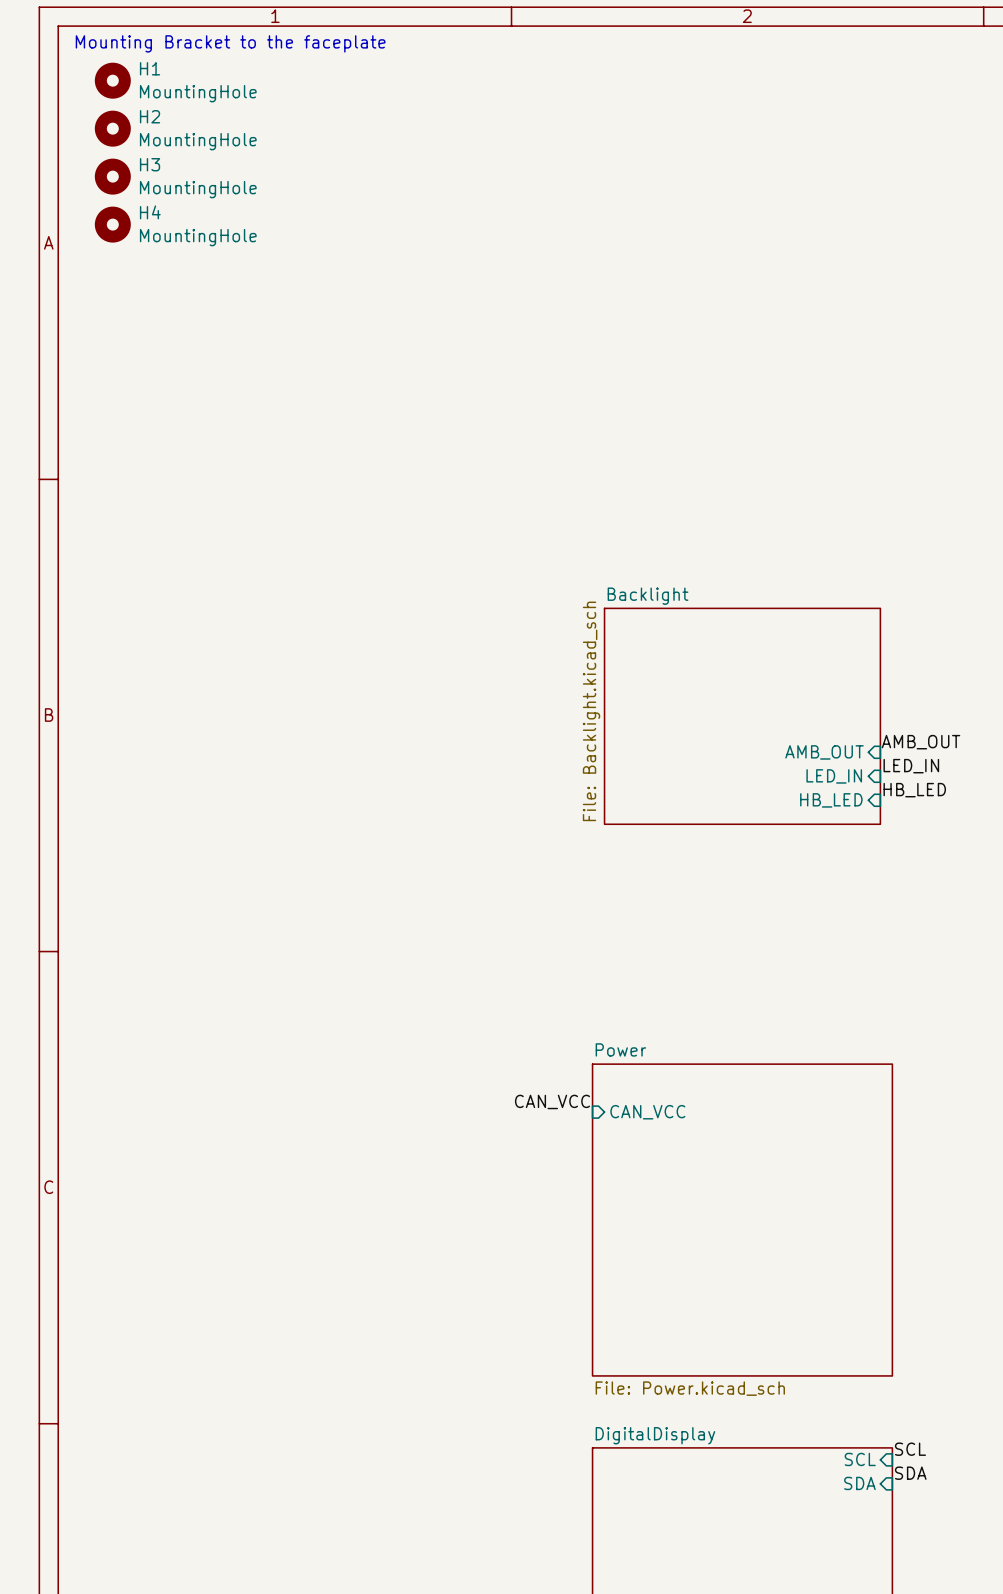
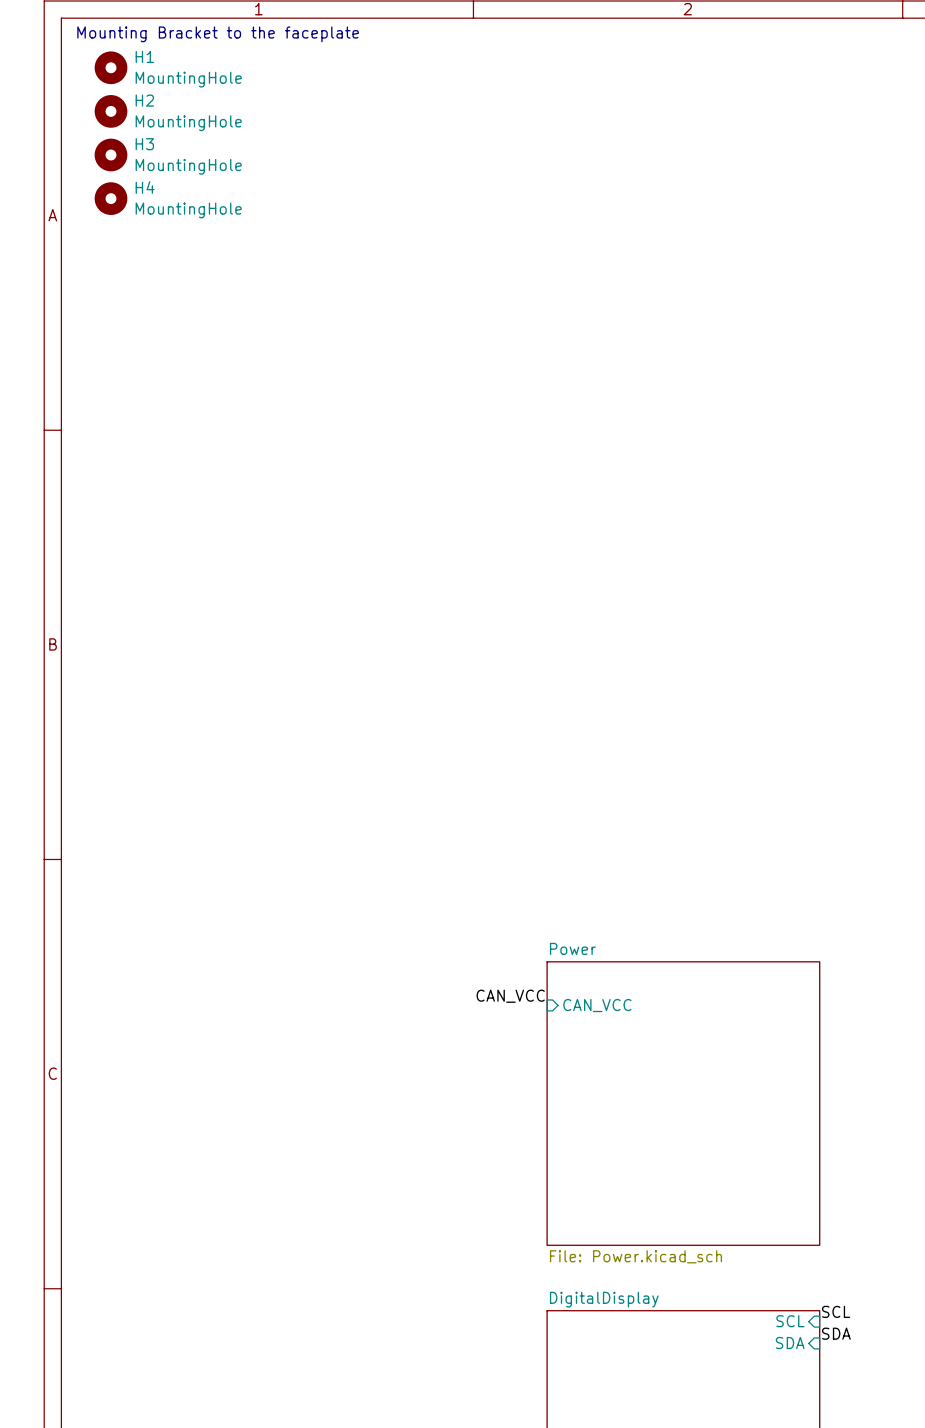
sheet Backlight: File: Backlight.kicad_sch (742, 716) -> none
label: AMB_OUT (921, 742) -> none
sheet pin: AMB_OUT (824, 752) -> none
label: LED_IN (911, 766) -> none
sheet pin: LED_IN (834, 776) -> none
label: HB_LED (914, 790) -> none
sheet pin: HB_LED (831, 800) -> none

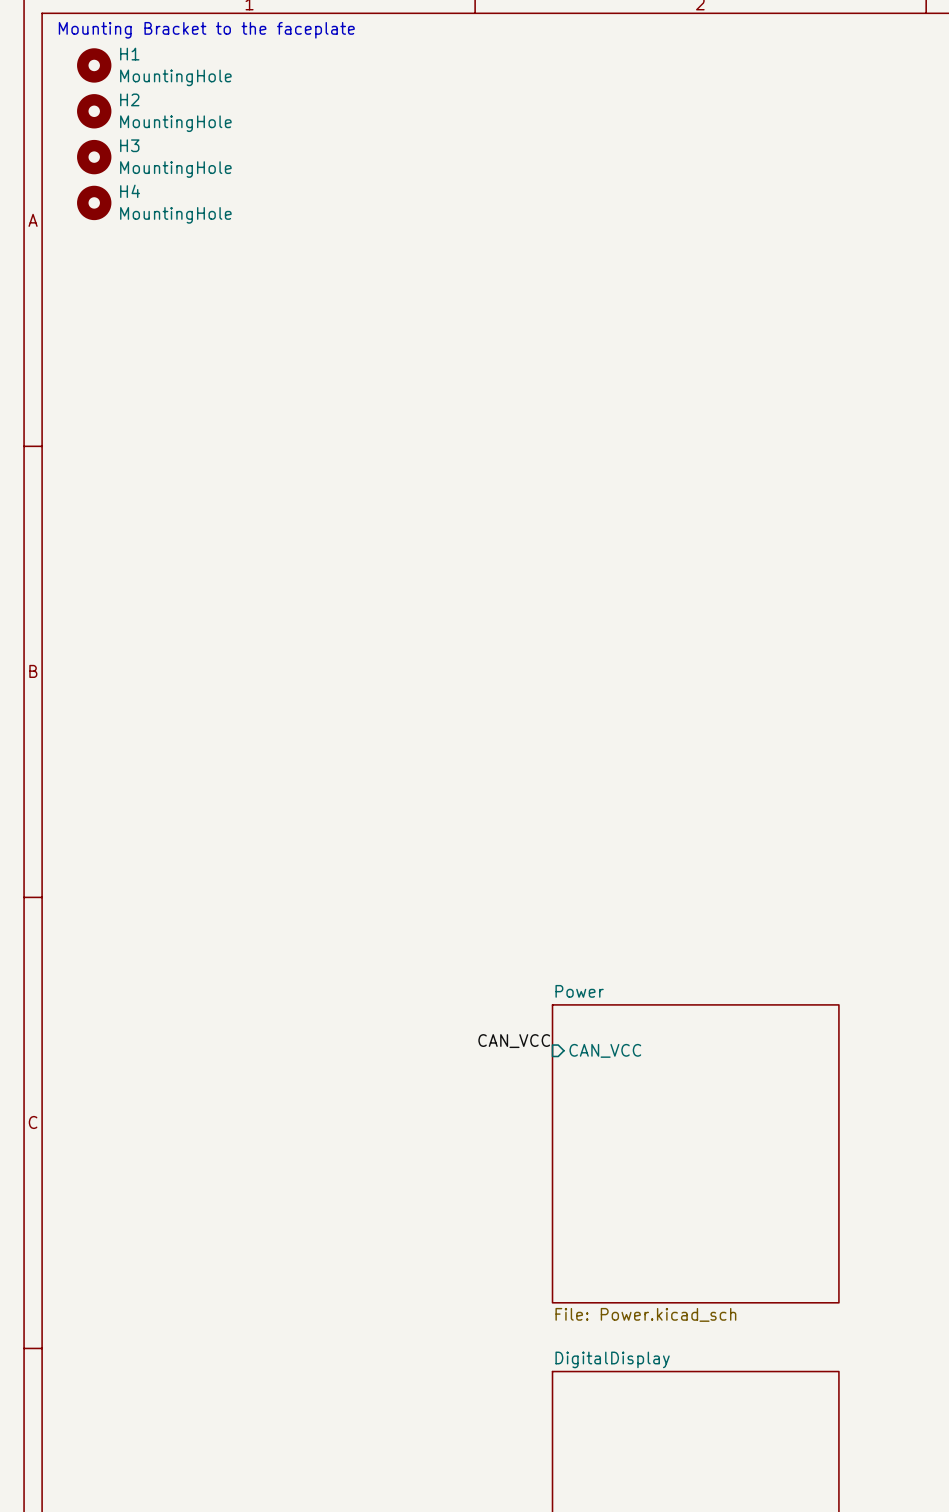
label: SCL (836, 1311) -> none
sheet pin: SCL (790, 1321) -> none
label: SDA (836, 1333) -> none
sheet pin: SDA (790, 1343) -> none

